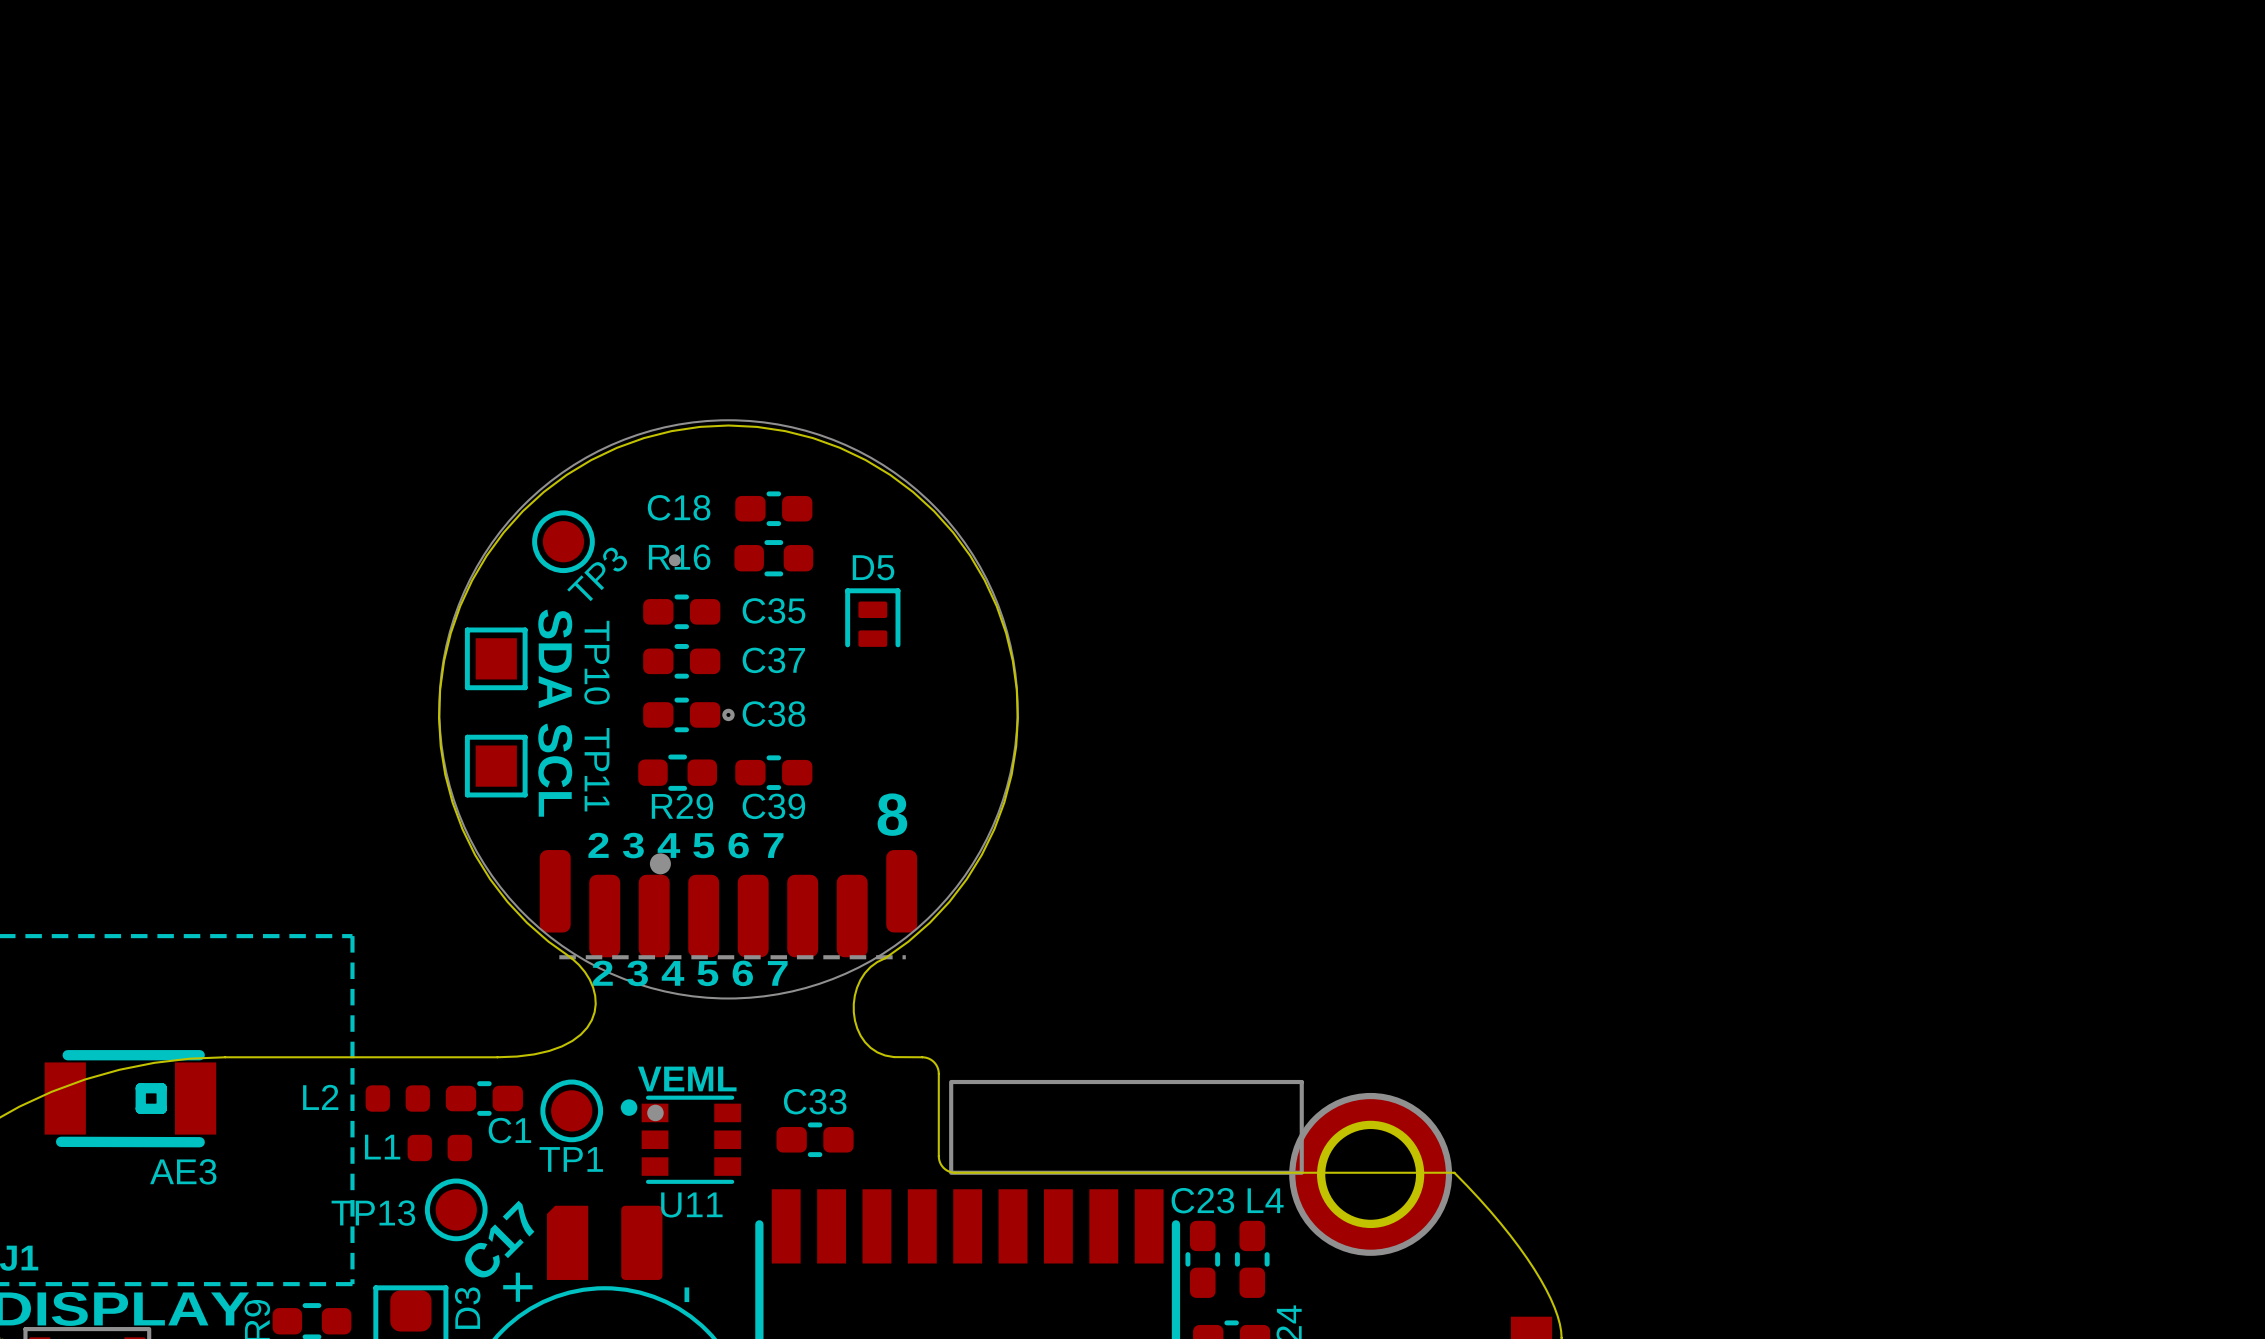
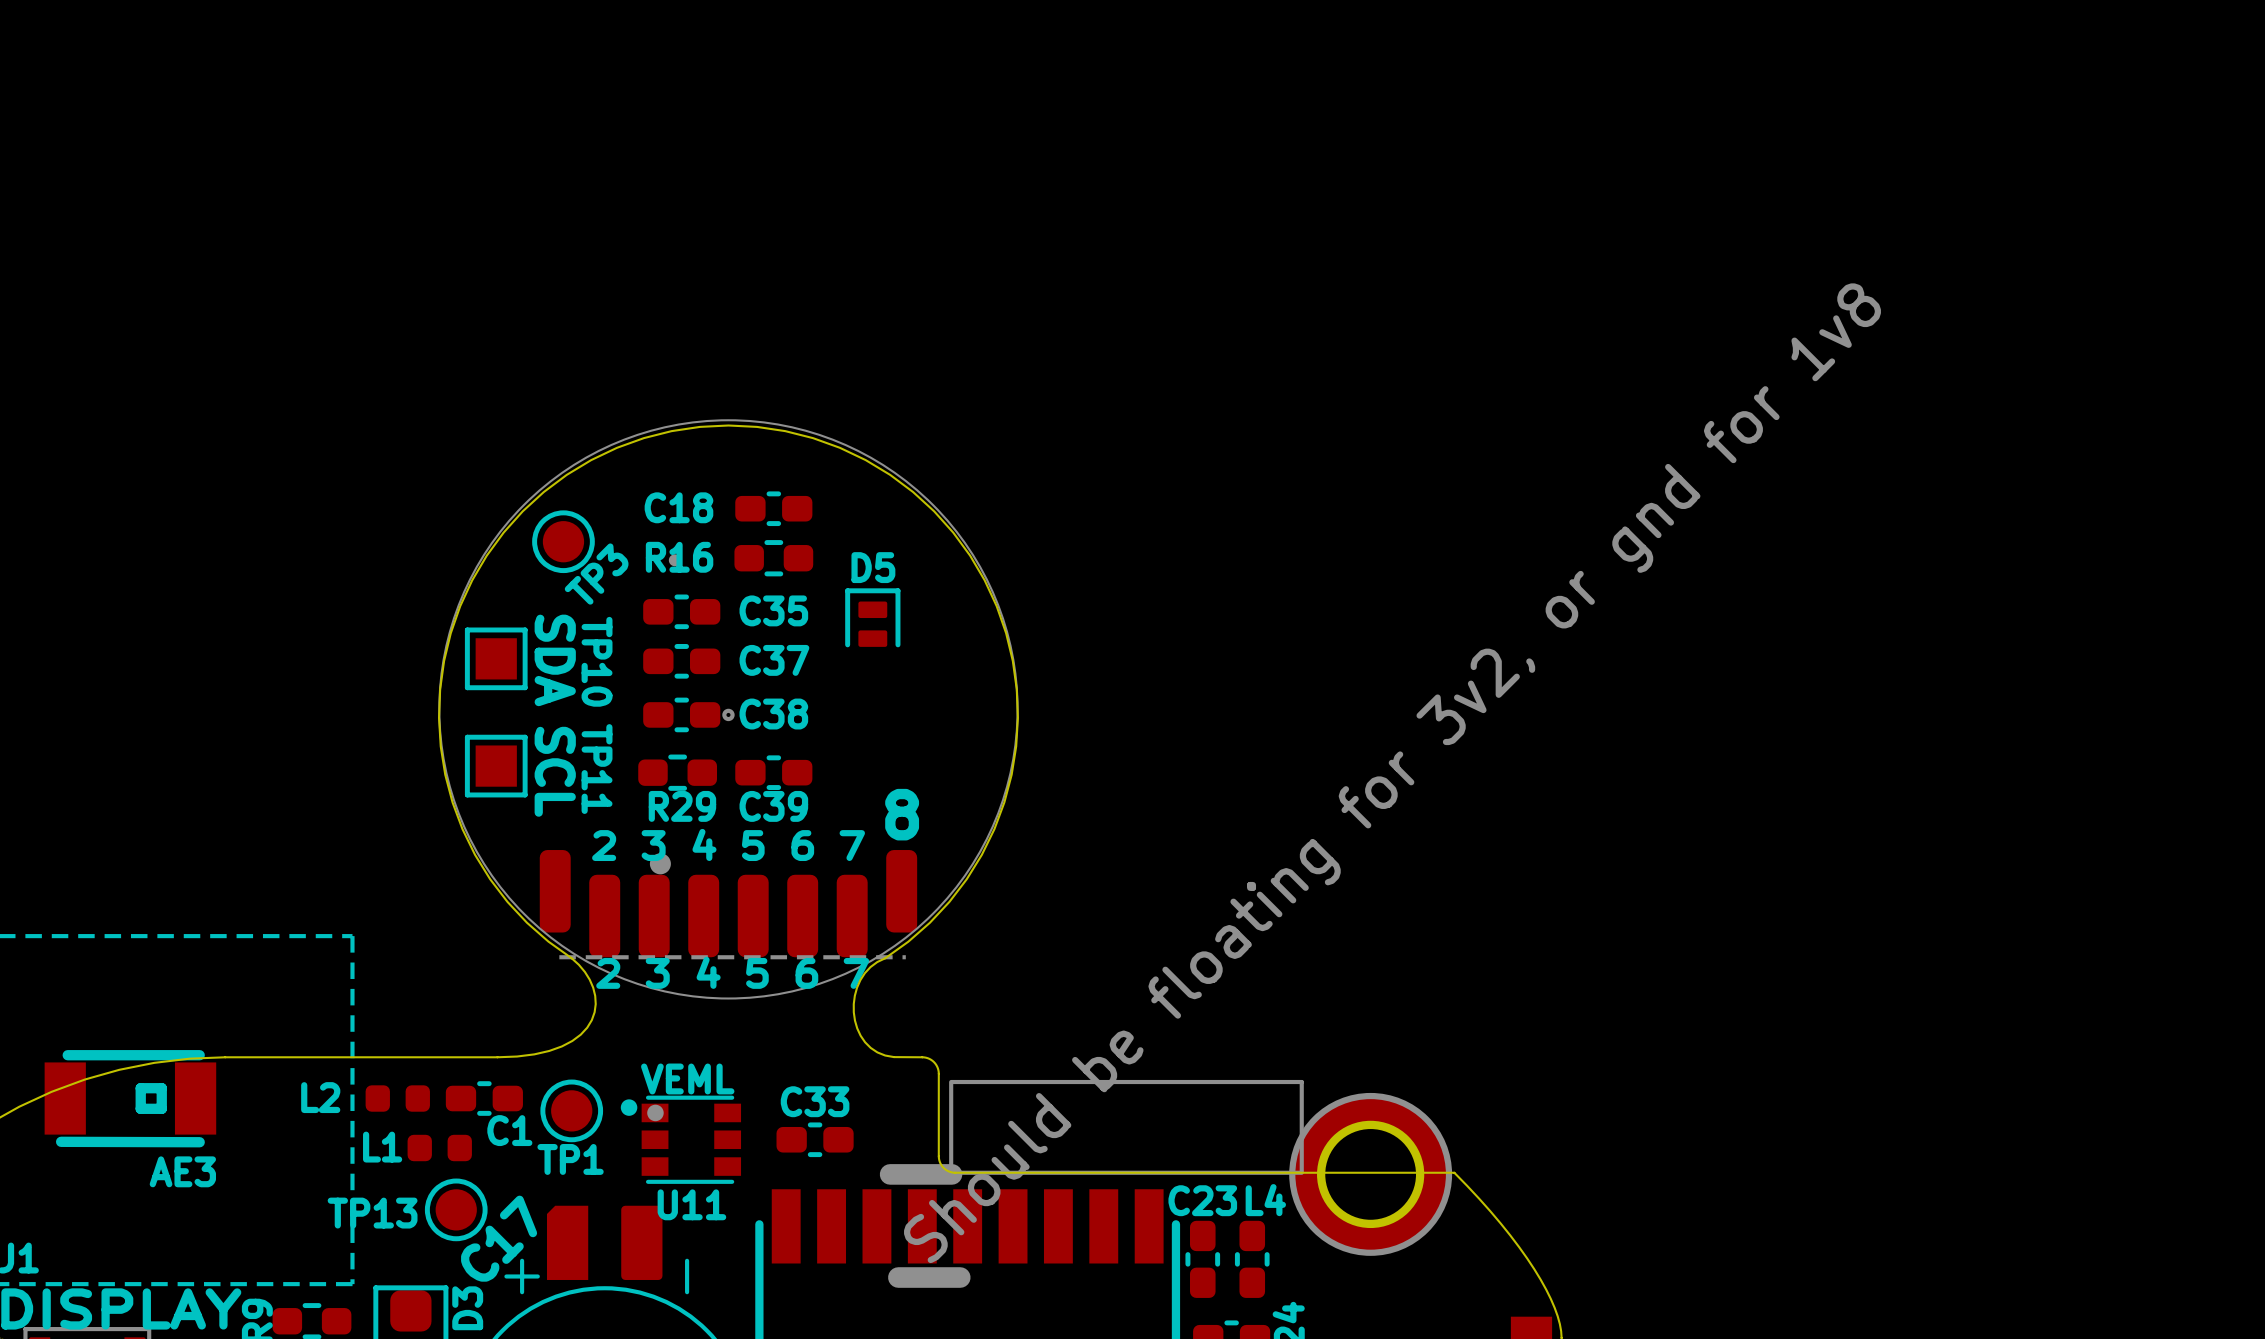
text: none -> Should be floating for 3v2, or gnd for 1v8 (1392, 773)
line: none -> (890, 1174) (952, 1174)
line: none -> (898, 1277) (960, 1277)

